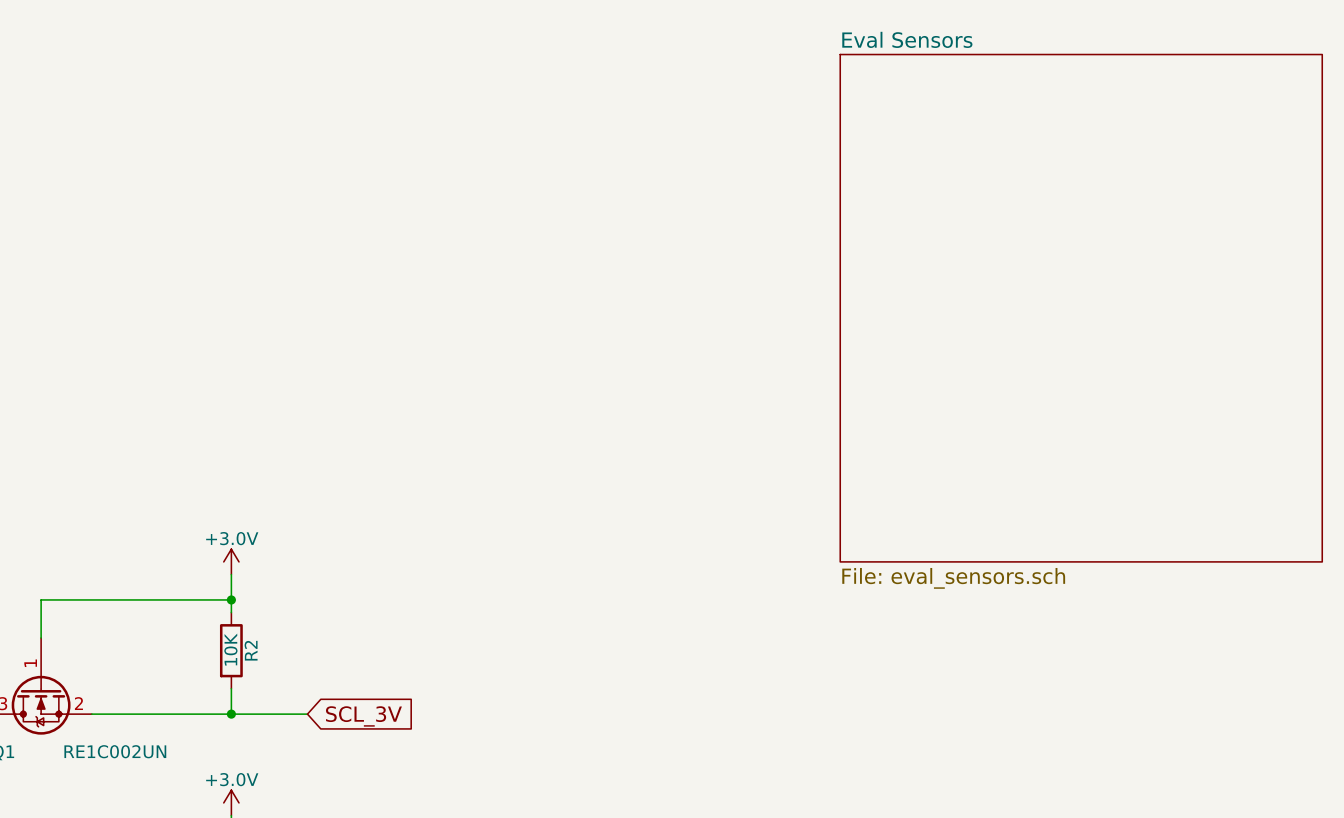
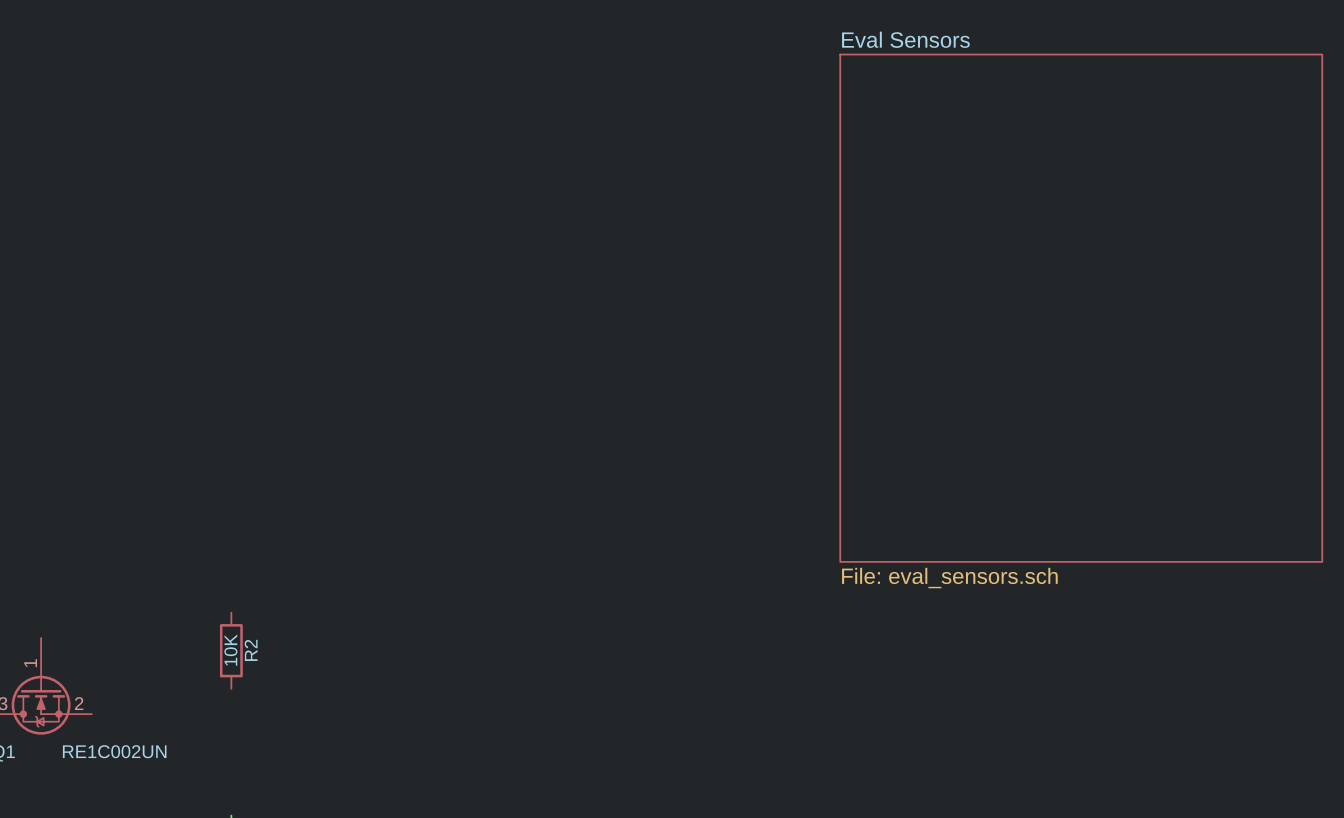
power symbol: +3.0V (231, 561) -> none
wire: (231, 574) (231, 612) -> none
wire: (231, 599) (41, 599) (41, 638) -> none
junction: (231, 599) -> none
wire: (231, 688) (231, 714) -> none
wire: (91, 714) (307, 714) -> none
junction: (231, 714) -> none
global label: SCL_3V (363, 716) -> none
power symbol: +3.0V (231, 802) -> none

